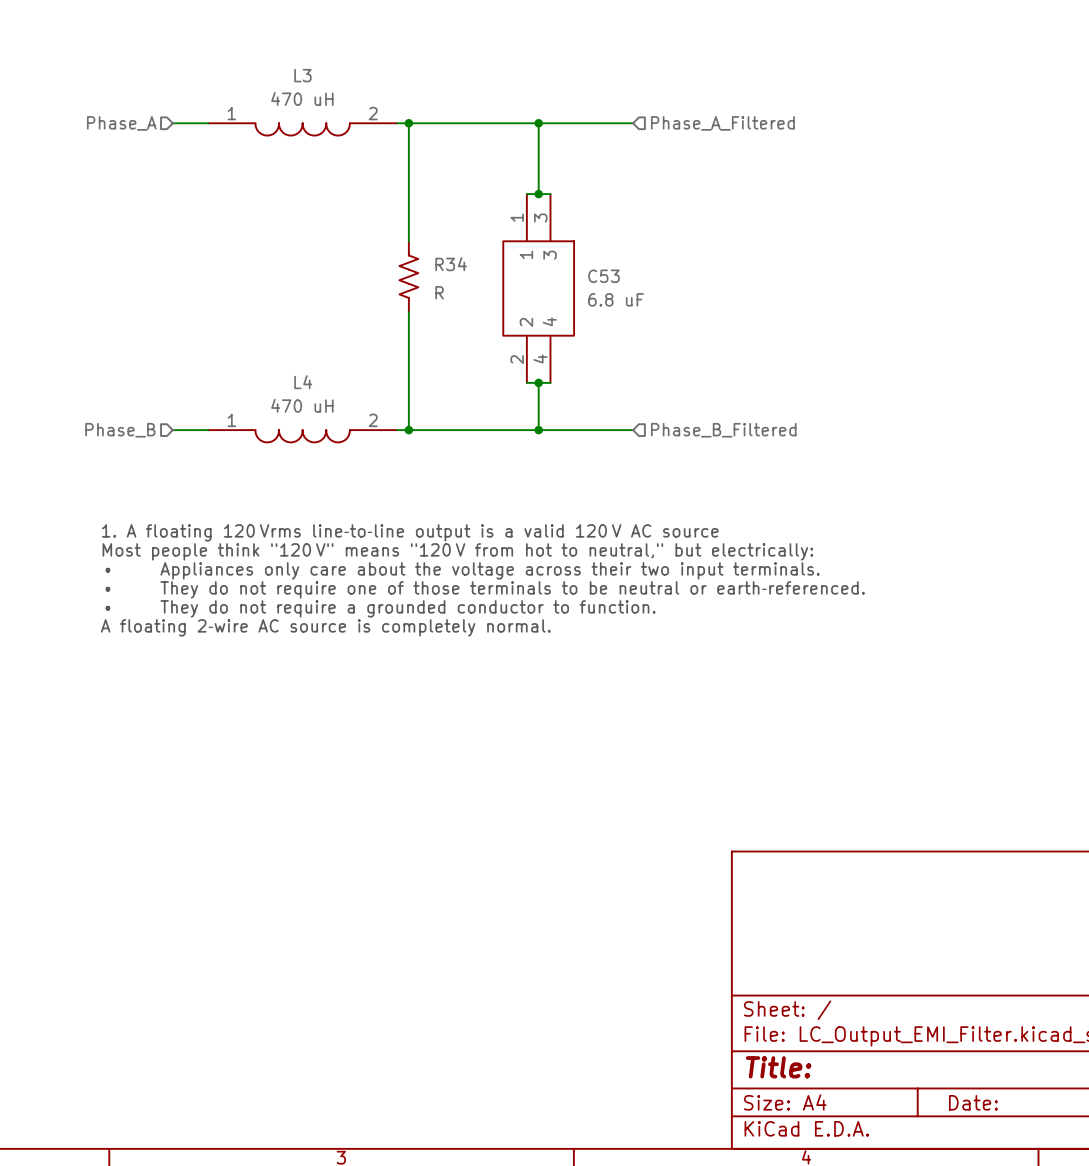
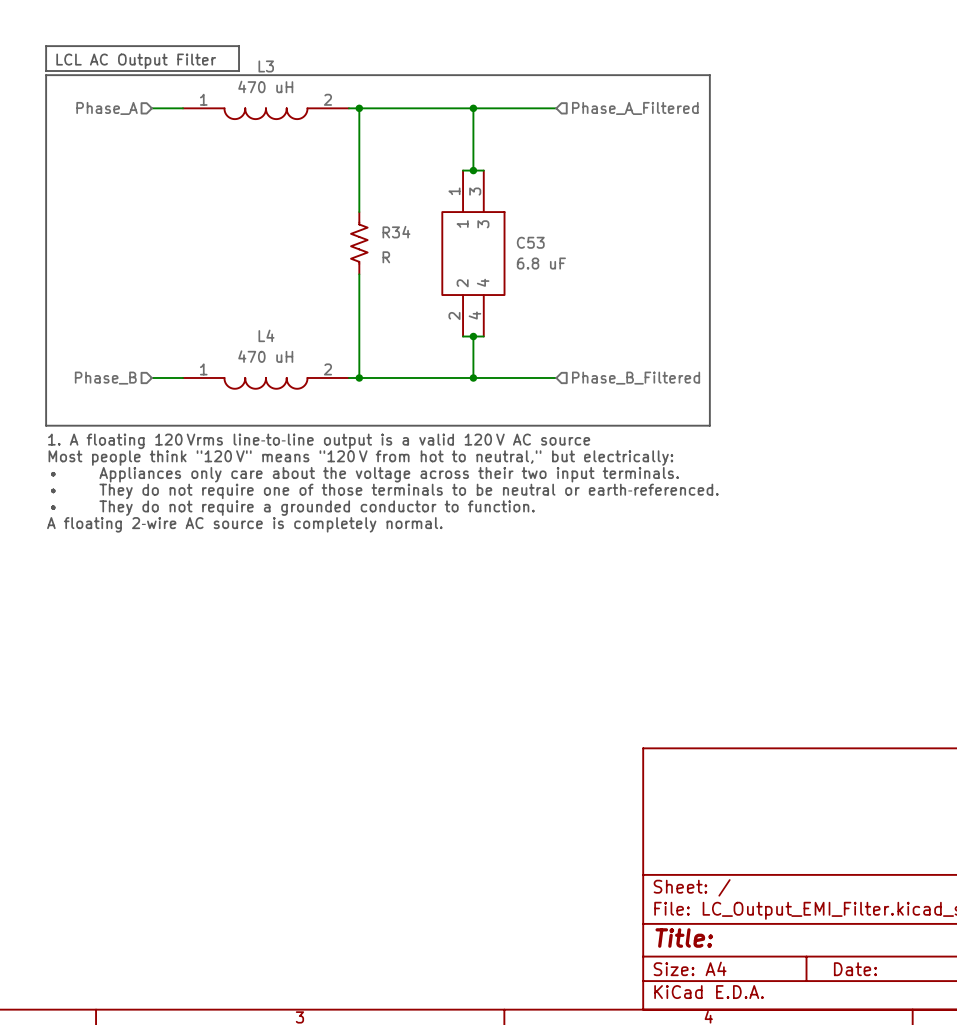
line: none -> (46, 46) (46, 71) (239, 71) (239, 46) (46, 46)
text: none -> LCL AC Output Filter (136, 61)
line: none -> (46, 75) (709, 75) (709, 425) (46, 425) (46, 75)
text position: 1. A floating 120 Vrms line‑to‑line output is a valid 120 V AC source (410, 532) -> 1. A floating 120 Vrms line‑to‑line output is a valid 120 V AC source (319, 441)
text position: Most people think "120 V" means "120 V from hot to neutral," but electrically: (457, 551) -> Most people think "120 V" means "120 V from hot to neutral," but electrically: (360, 458)
text position: • Appliances only care about the voltage across their two input terminals. (462, 570) -> • Appliances only care about the voltage across their two input terminals. (364, 474)
text position: • They do not require one of those terminals to be neutral or earth‑referenced. (485, 589) -> • They do not require one of those terminals to be neutral or earth‑referenced. (384, 491)
text position: • They do not require a grounded conductor to function. (380, 608) -> • They do not require a grounded conductor to function. (292, 508)
text position: A floating 2‑wire AC source is completely normal. (325, 627) -> A floating 2‑wire AC source is completely normal. (244, 524)

